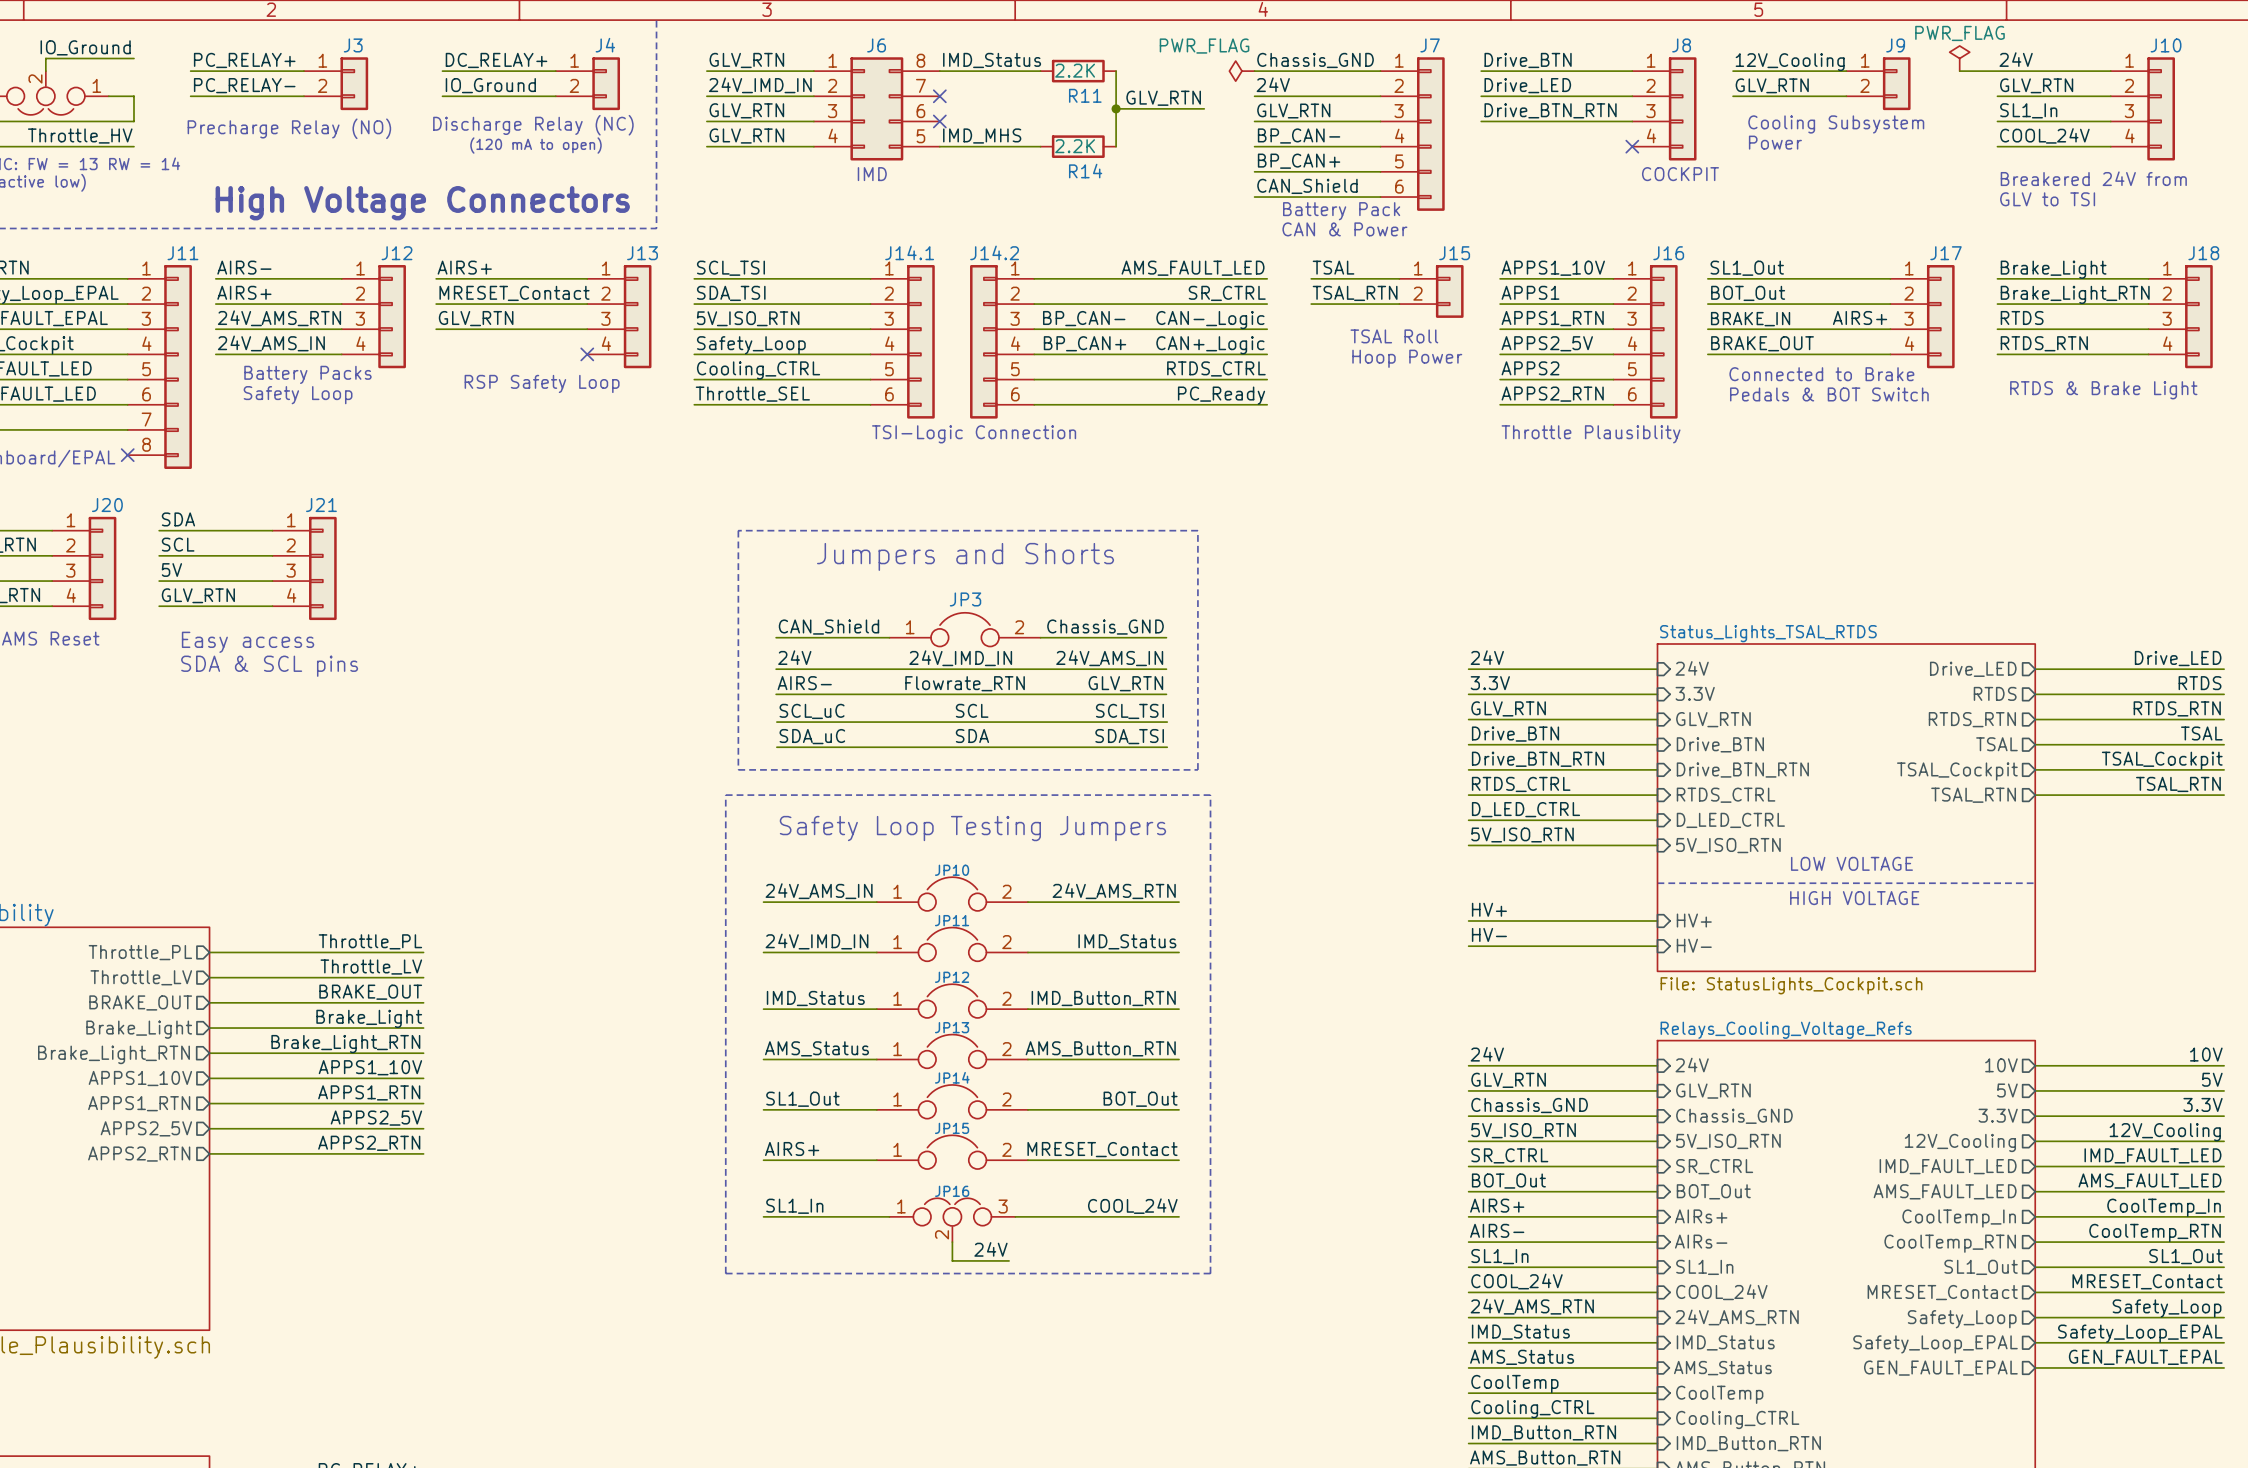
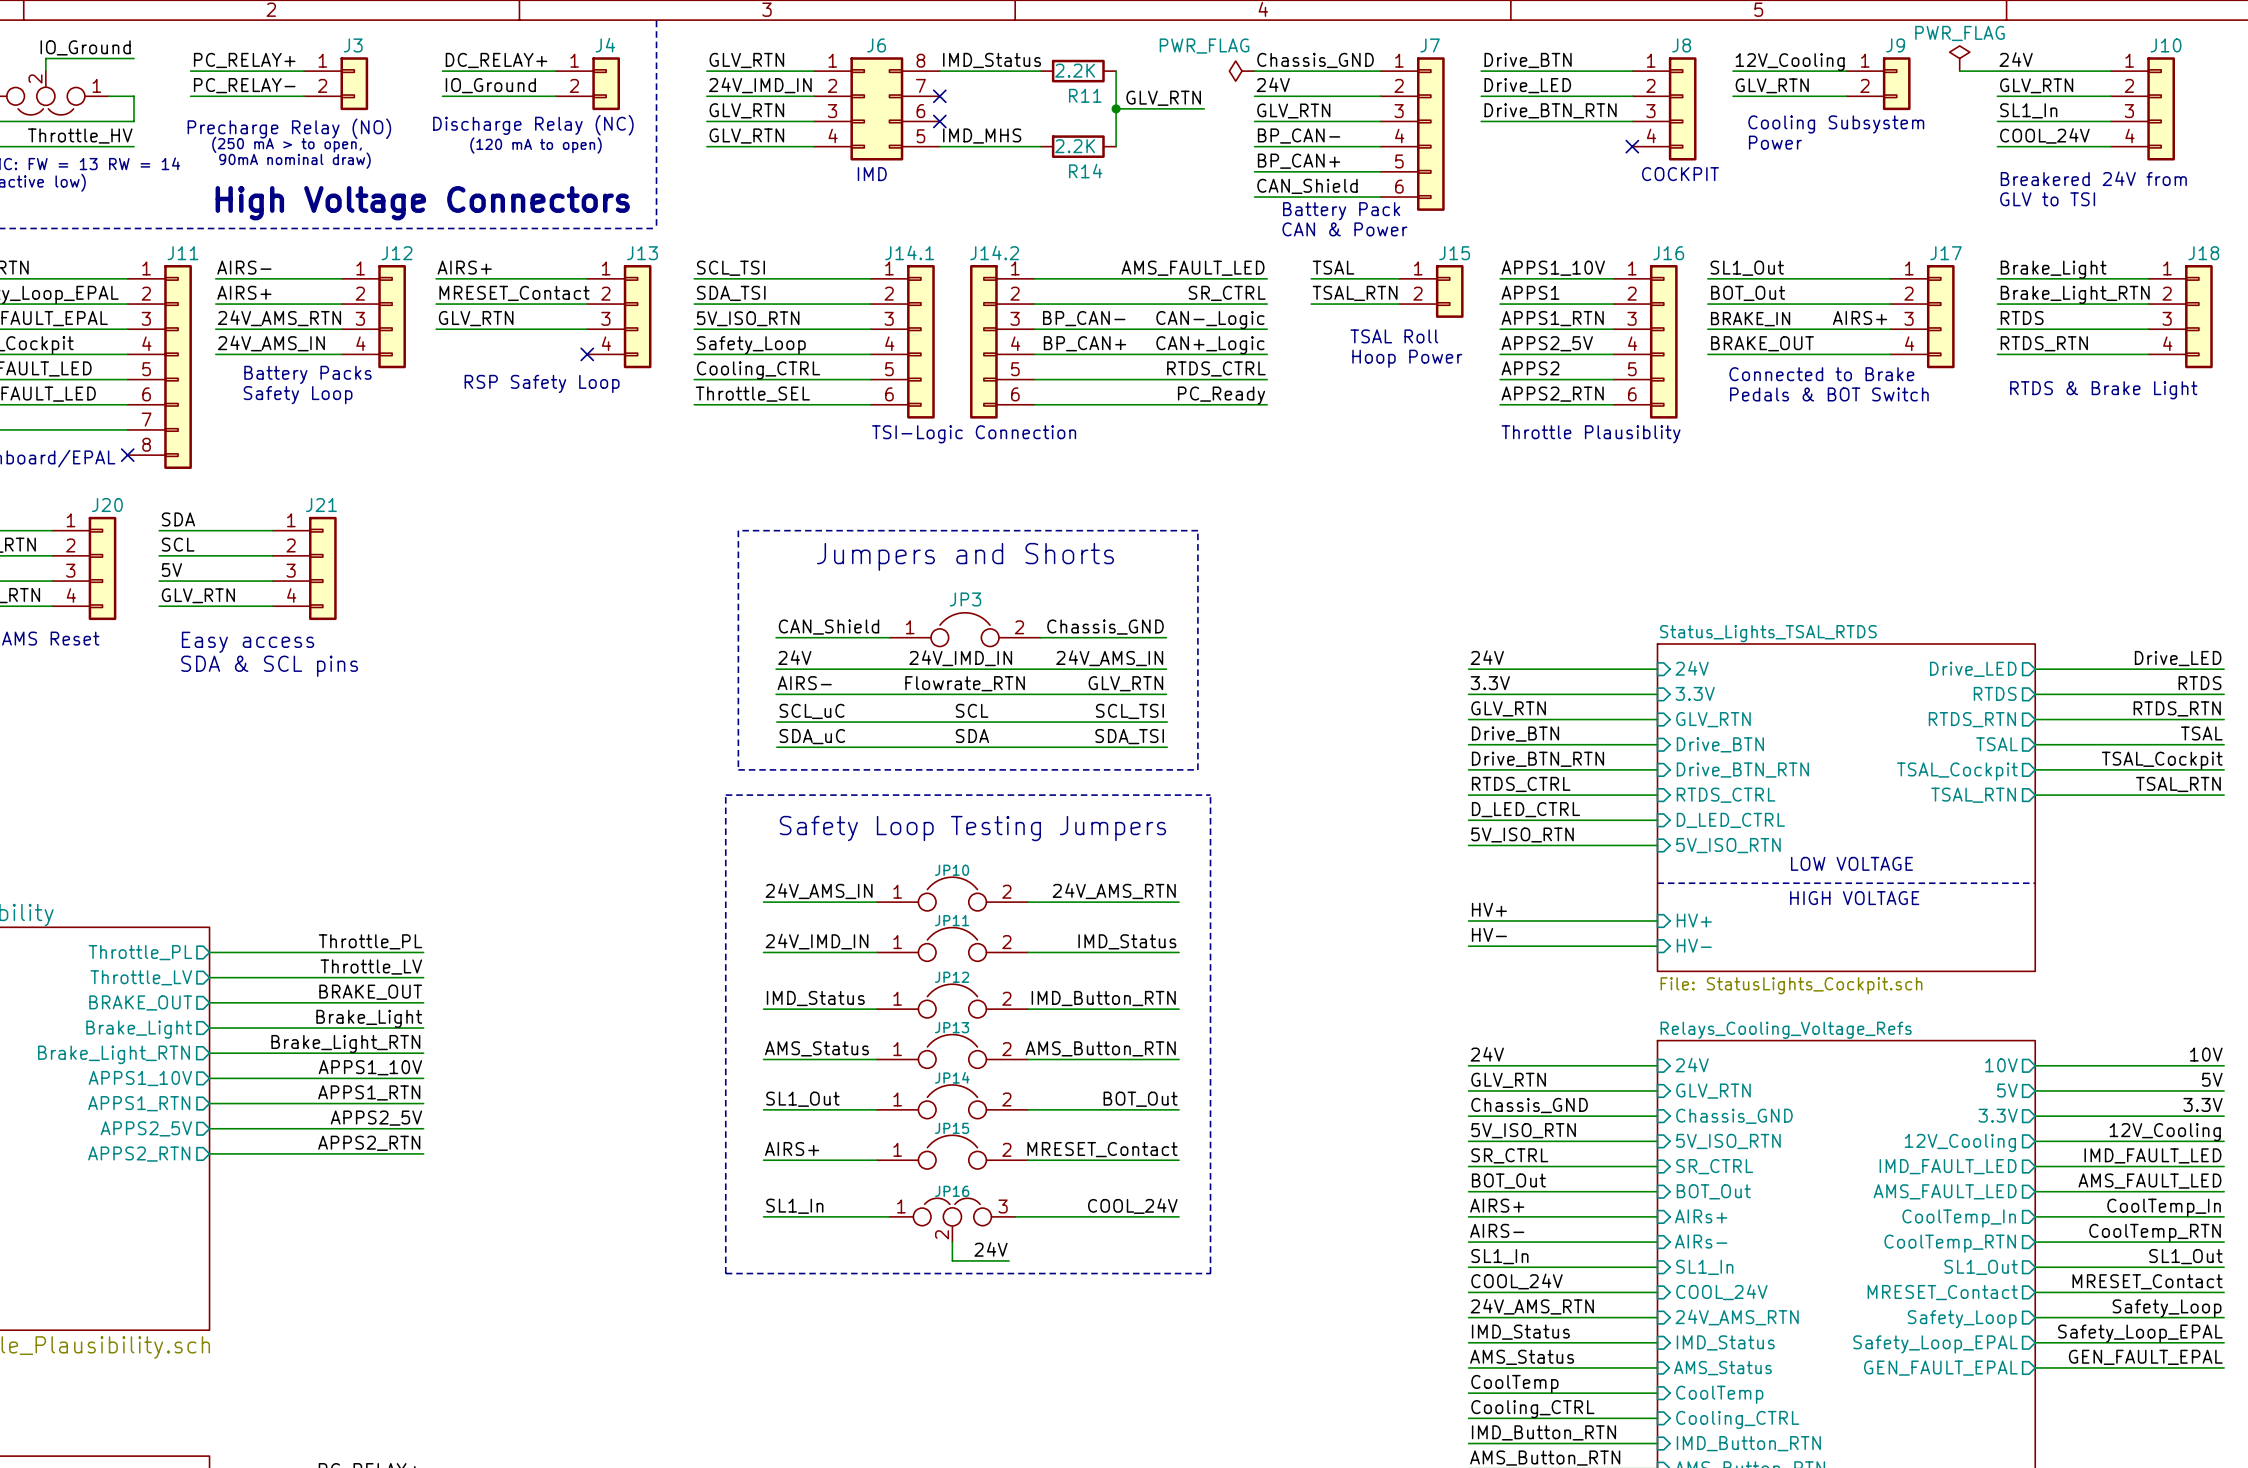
text: none -> (250 mA > to open, (286, 144)
text: none -> 90mA nominal draw) (294, 160)

